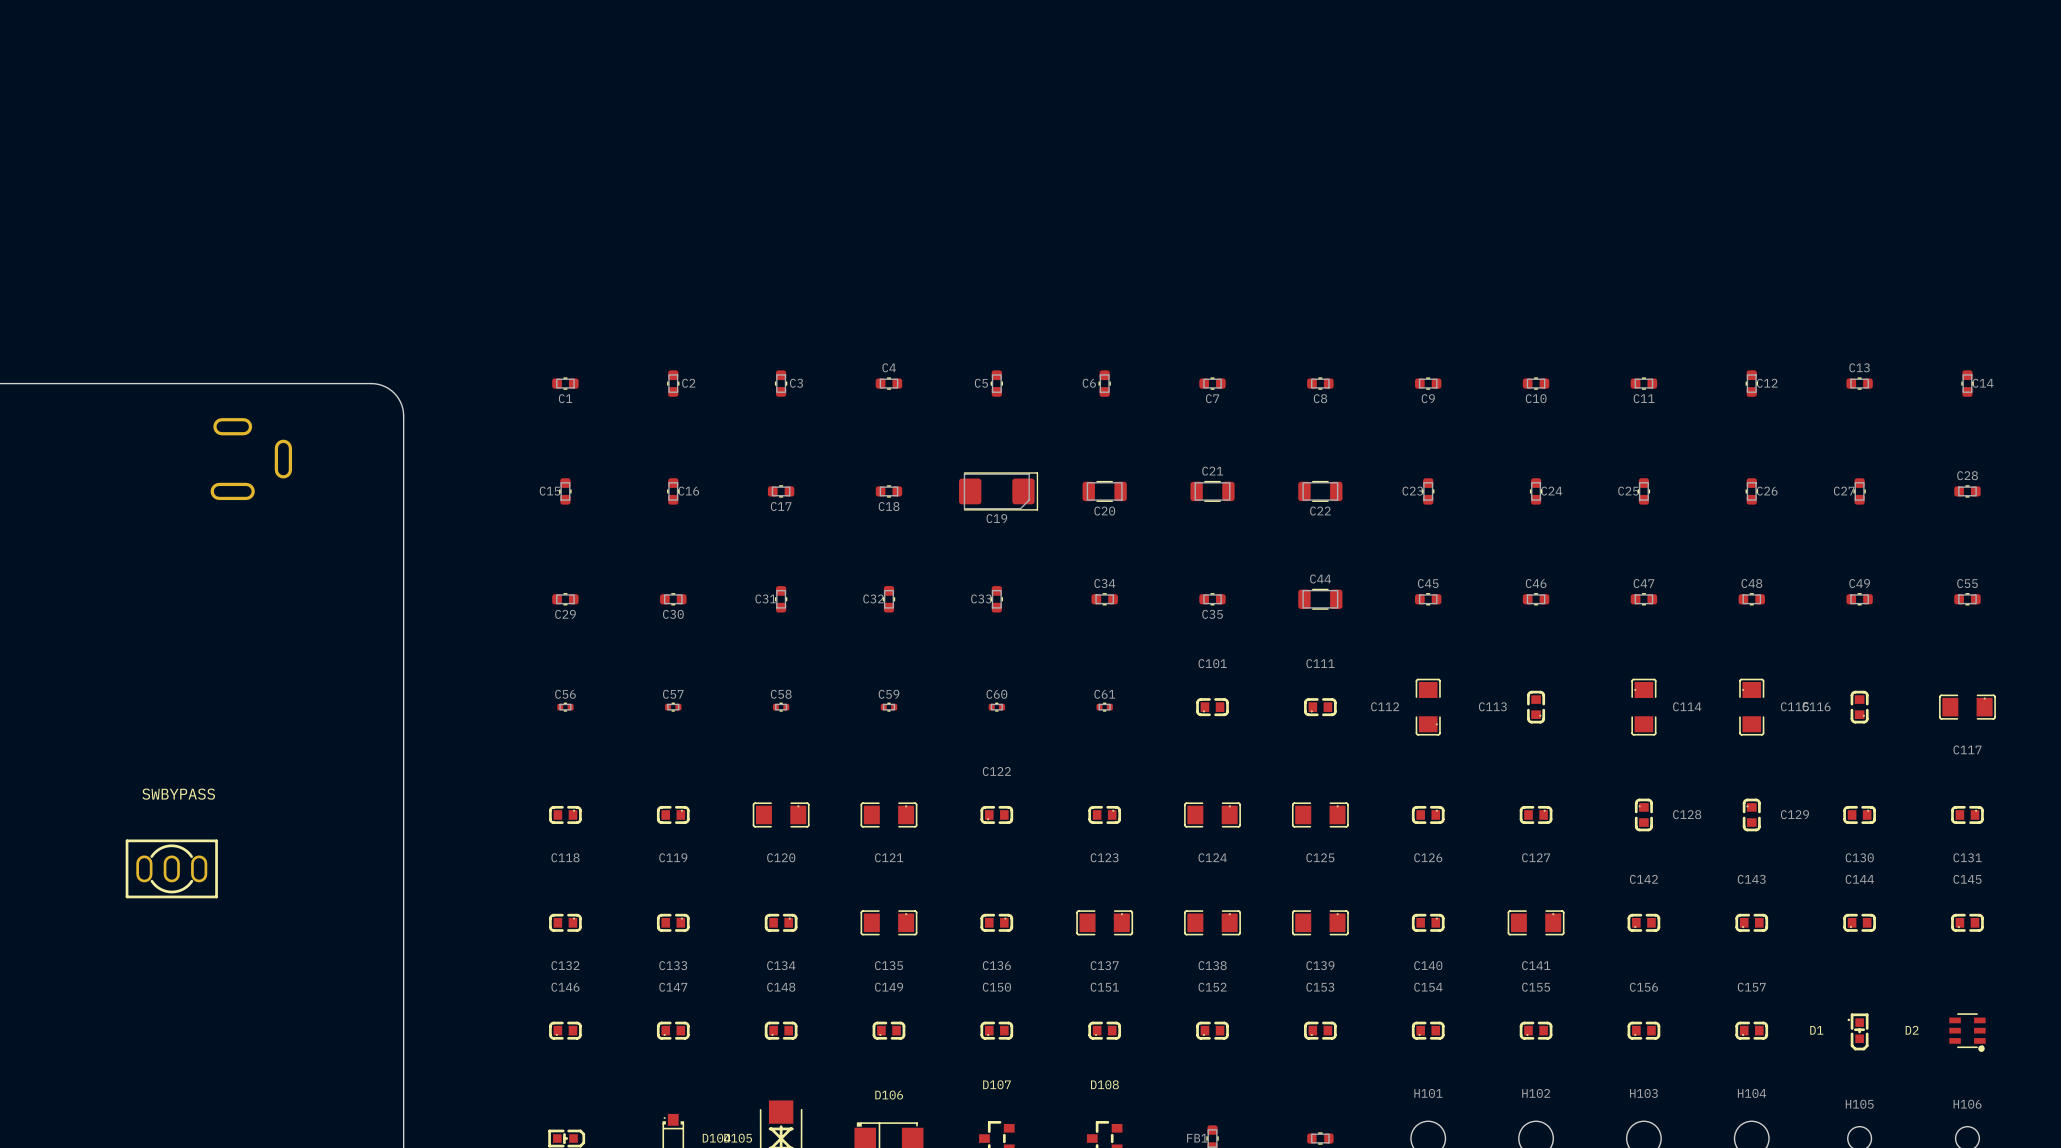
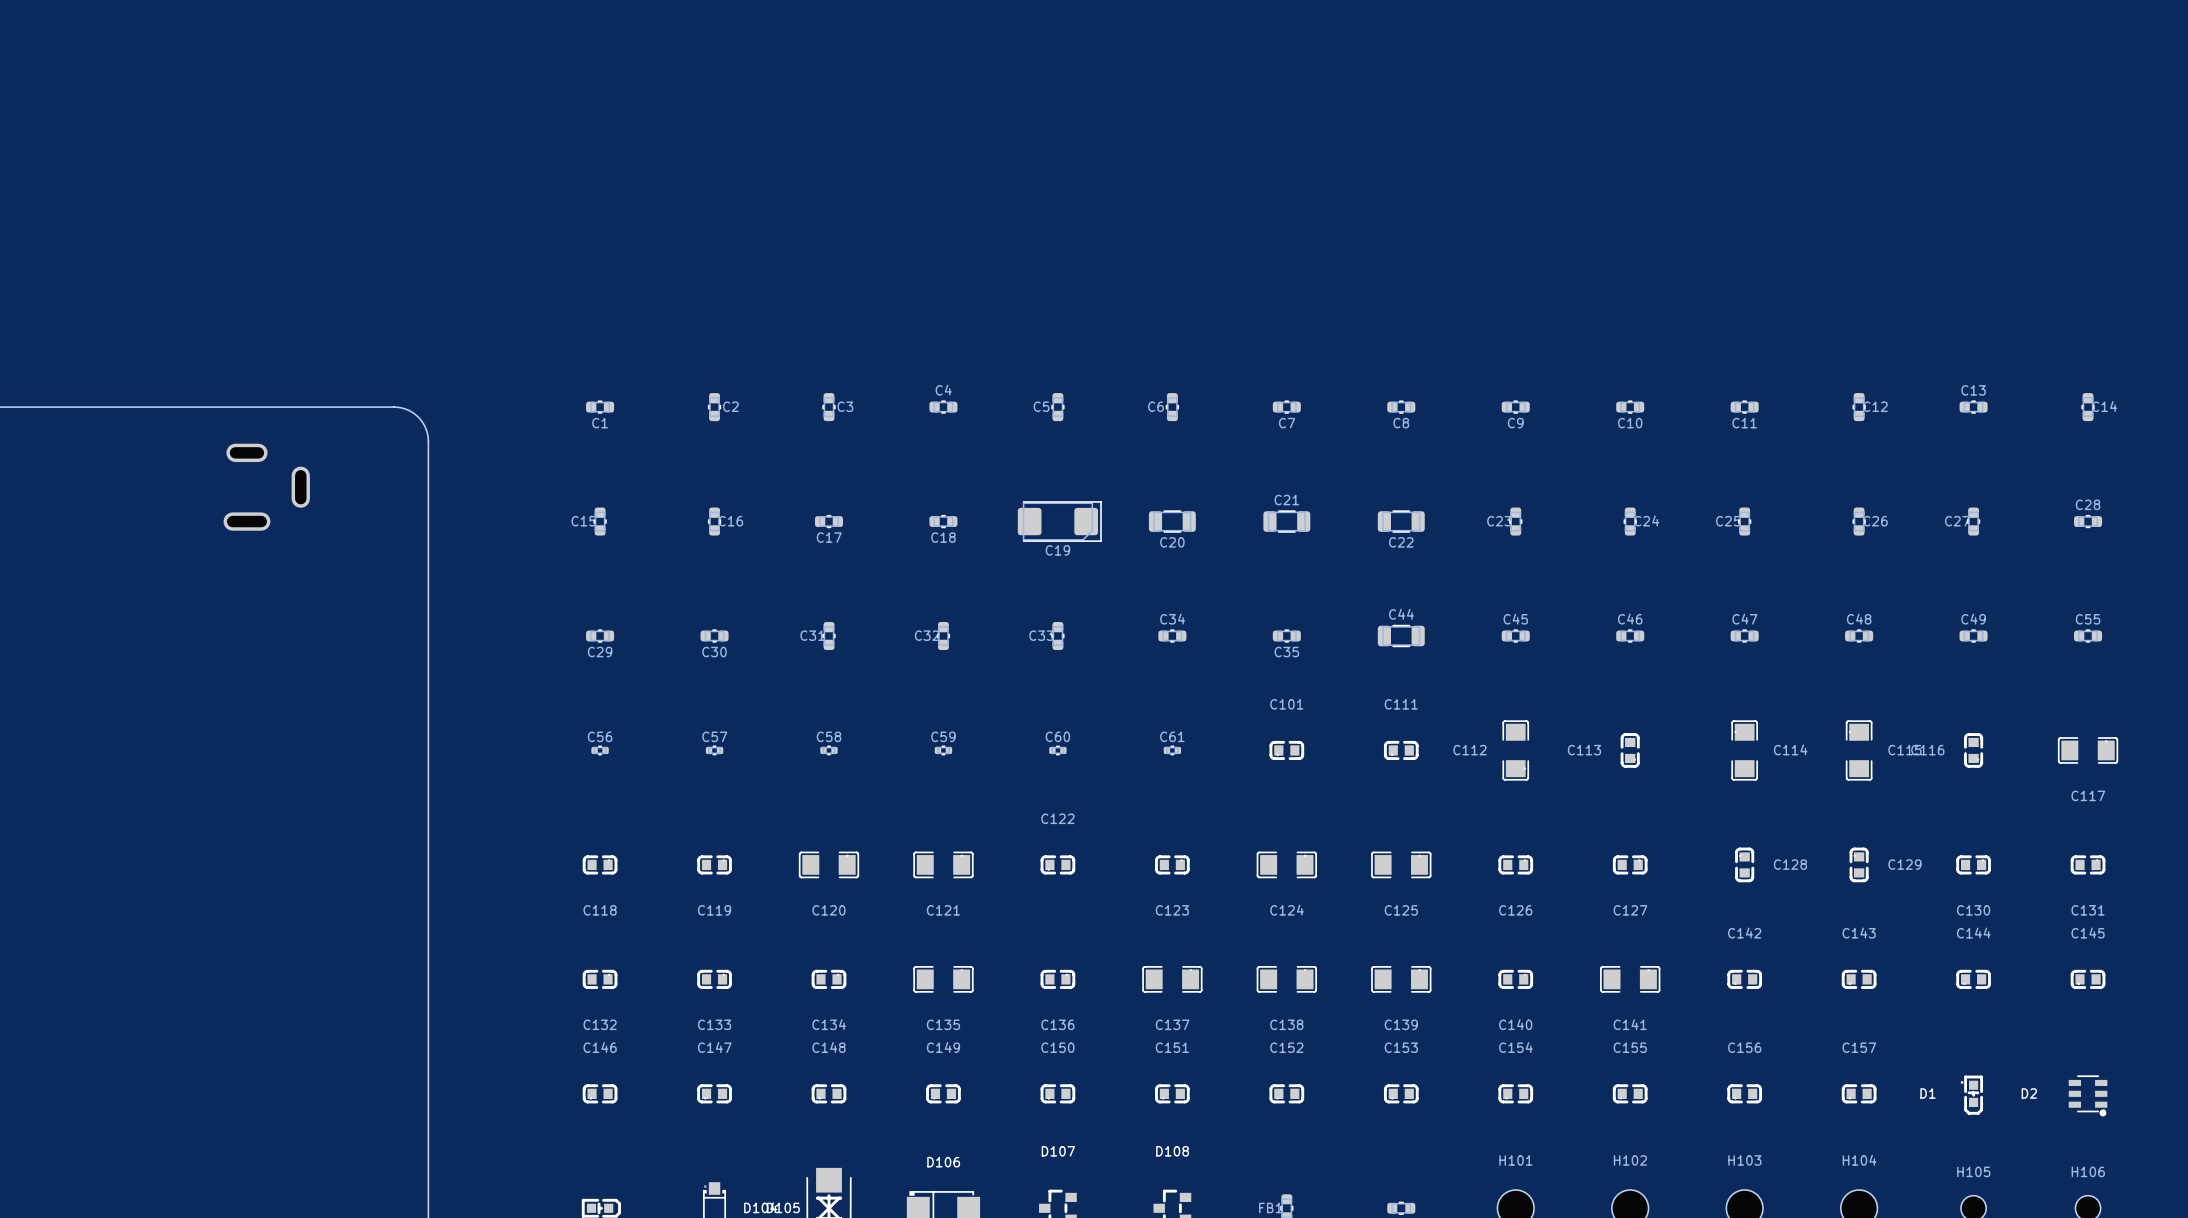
SWBYPASS: (171, 868) -> none

